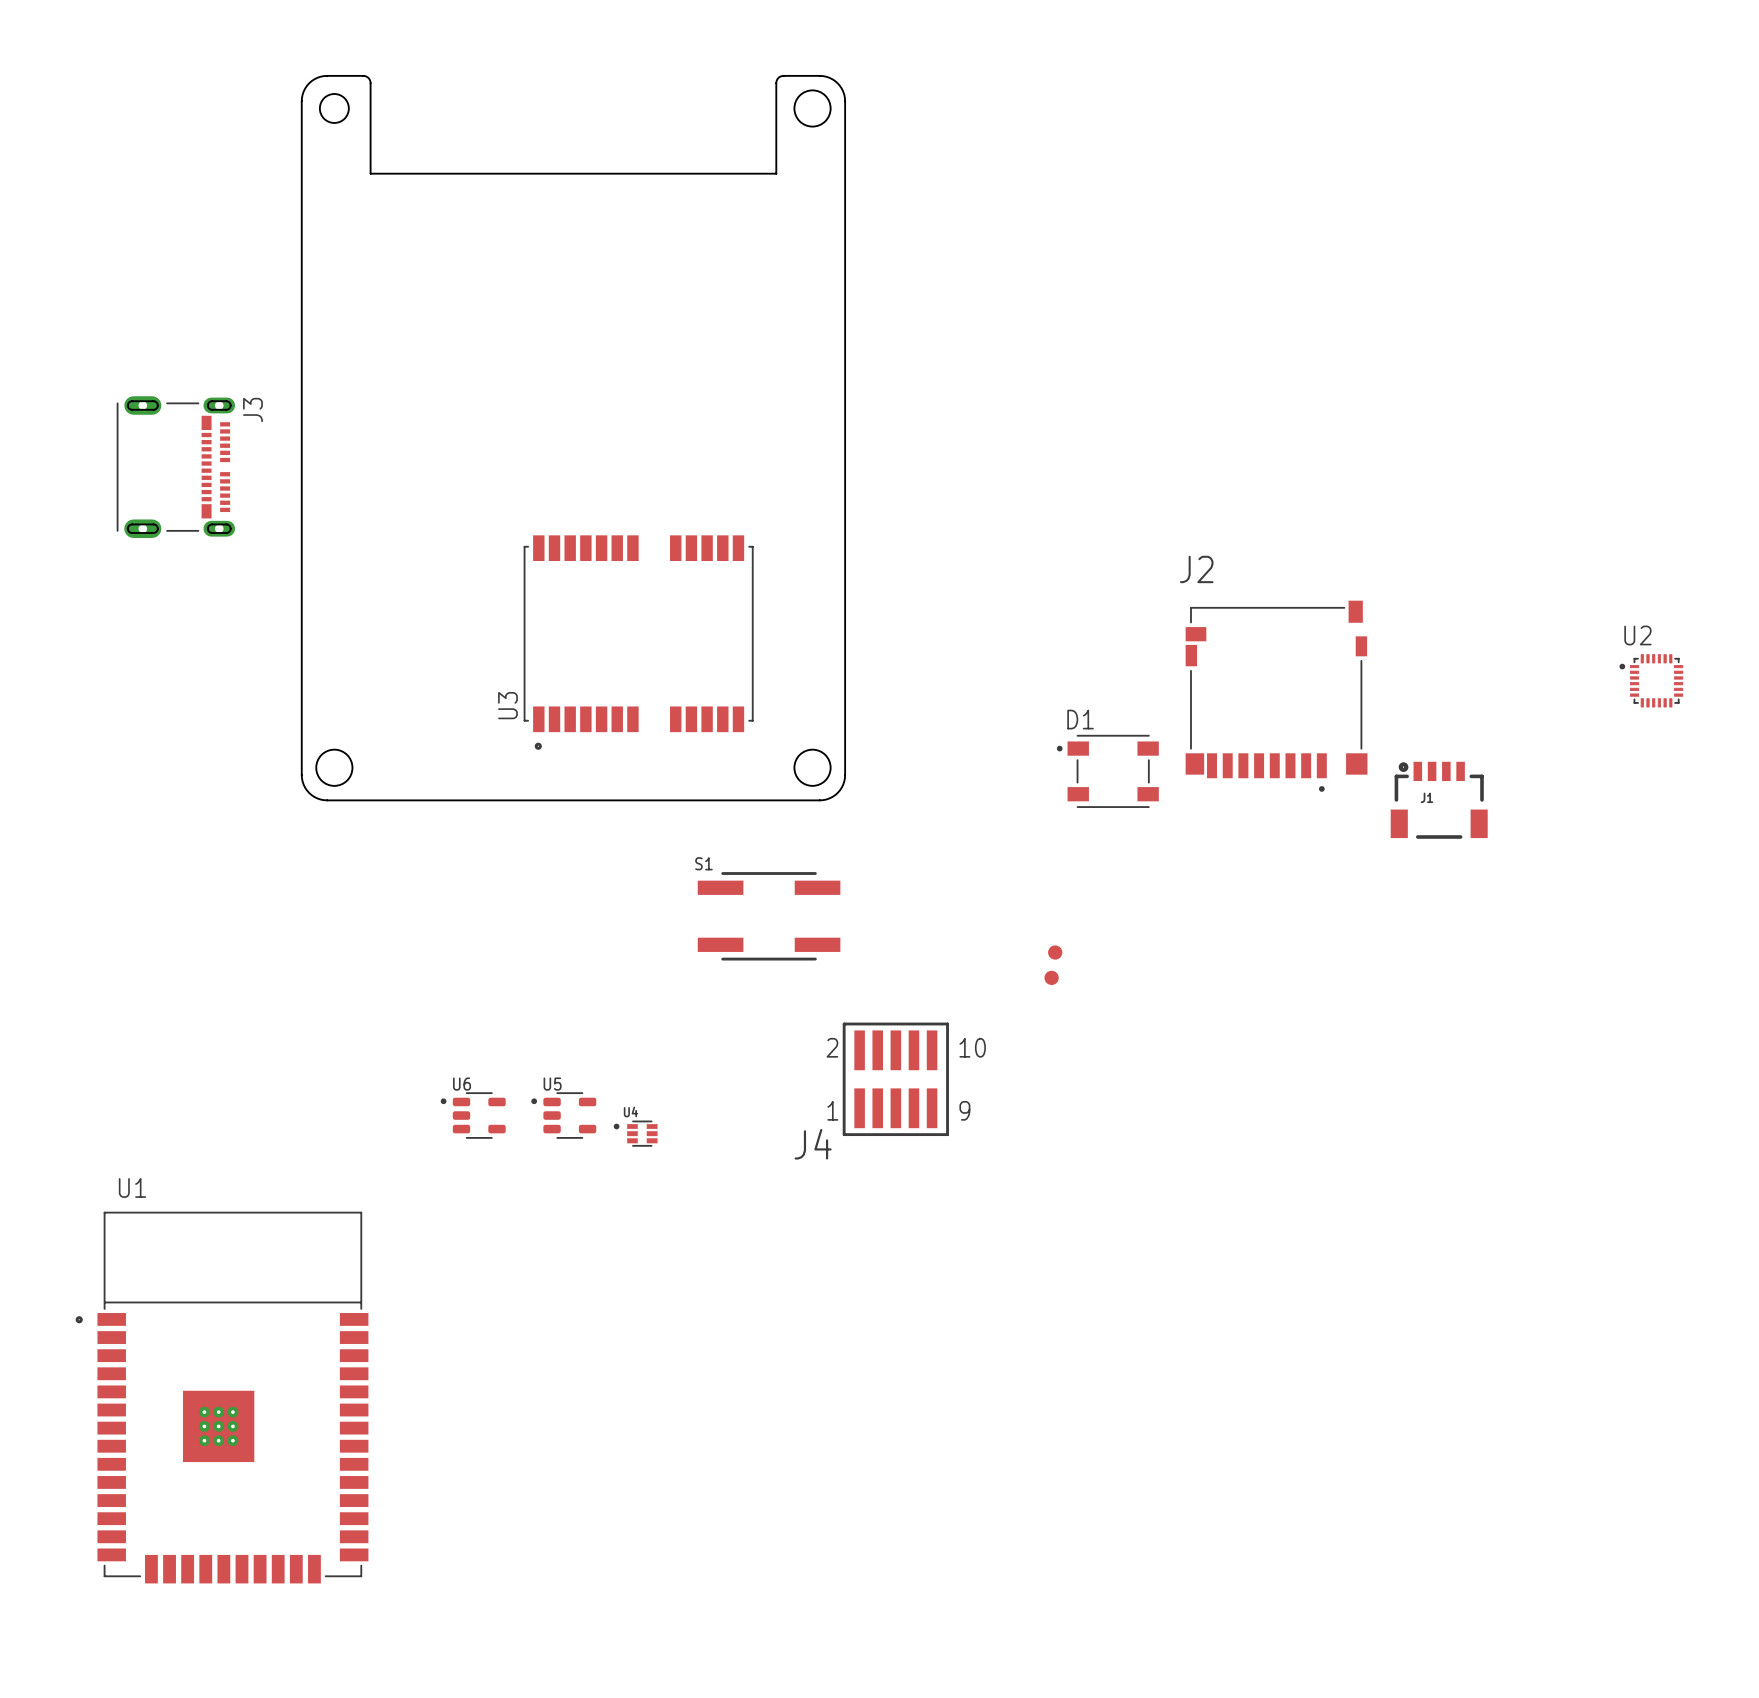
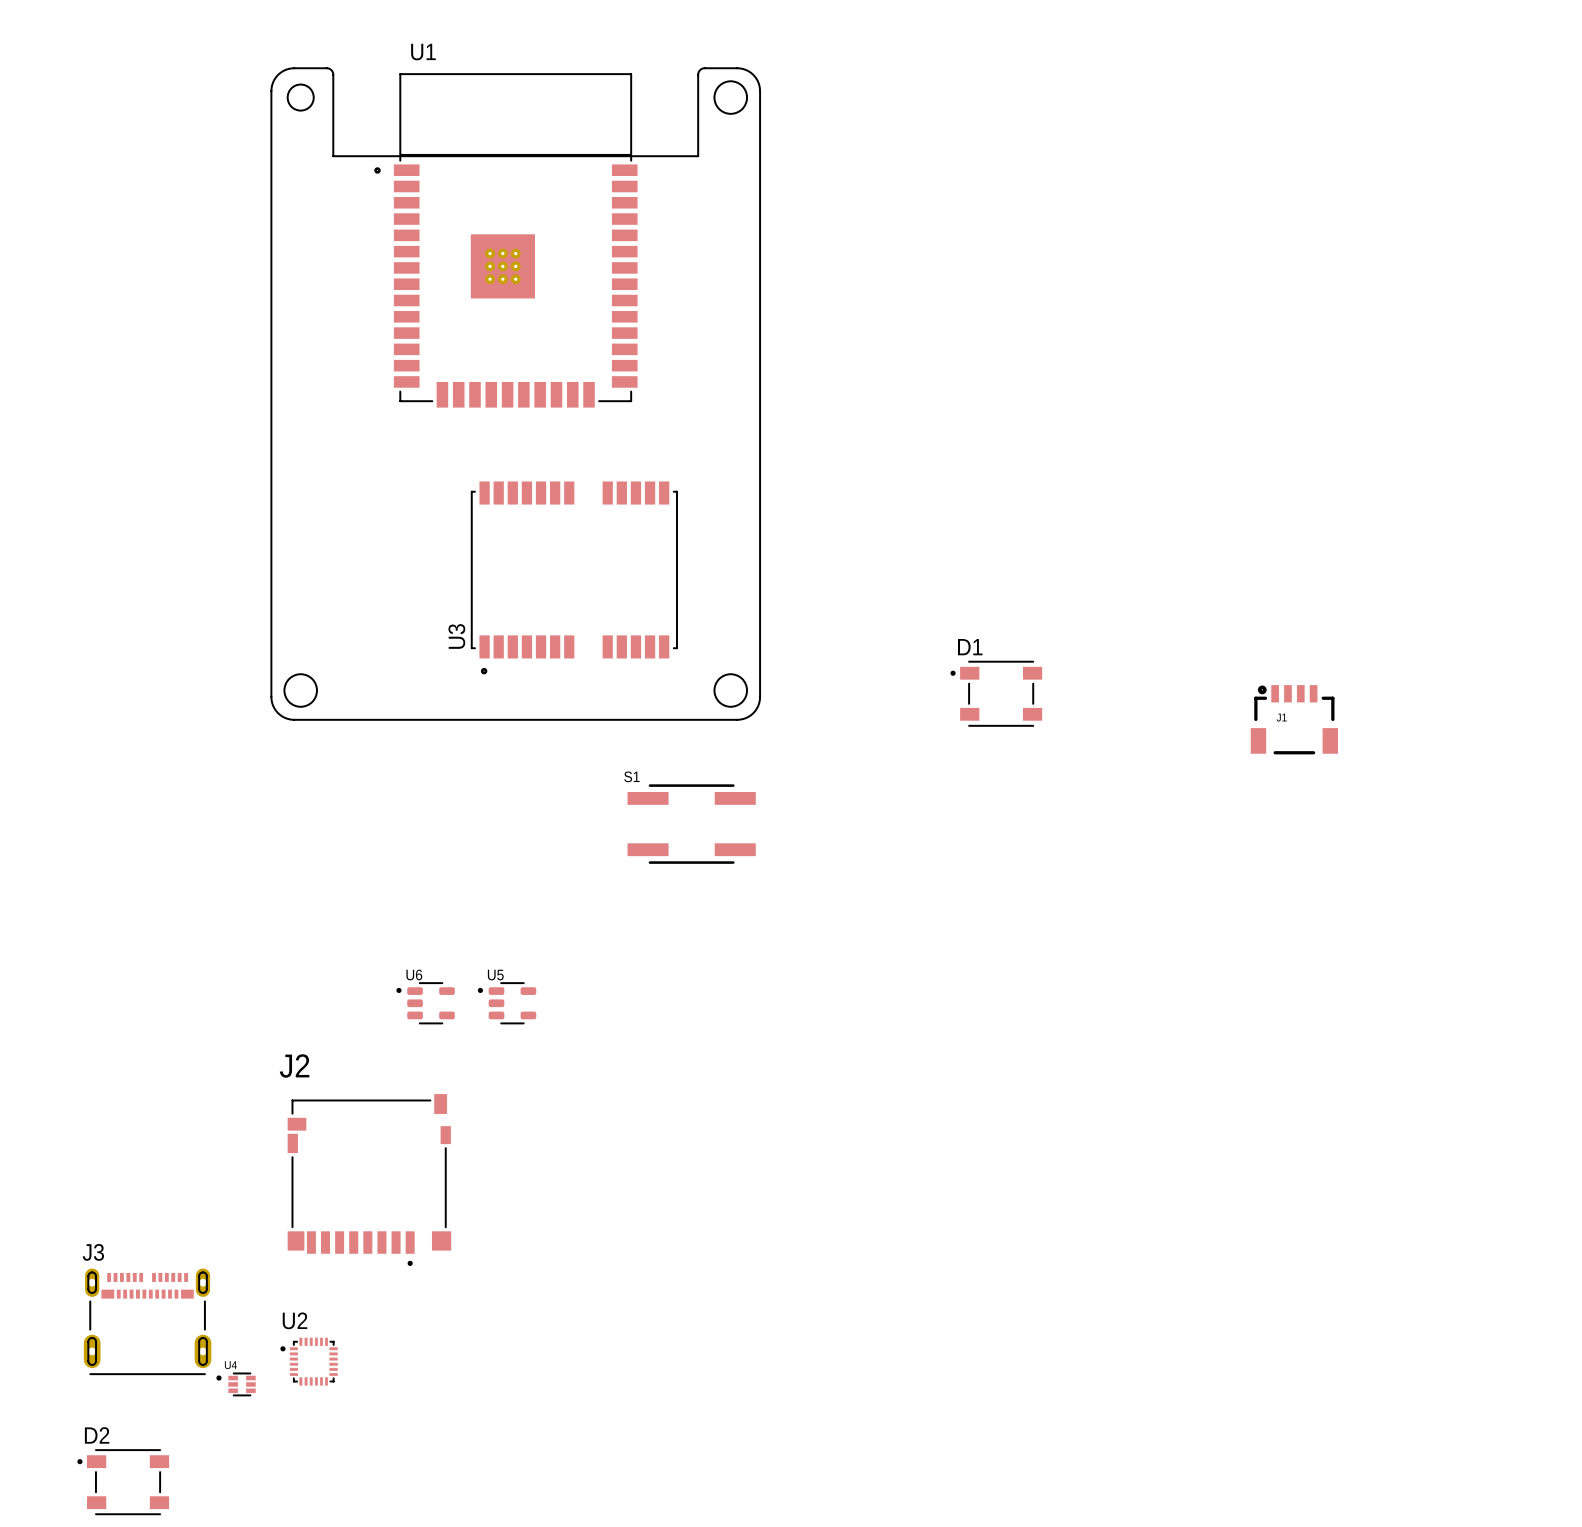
J3 rotation: 0° (175, 467) -> 90° counterclockwise (147, 1321)
J3 position: (175, 467) -> (147, 1321)
U2 position: (1651, 680) -> (309, 1361)
J2 position: (1276, 696) -> (369, 1180)
part: (1055, 952) -> none
part: (1051, 977) -> none
J4: (895, 1079) -> none
U4 position: (635, 1133) -> (236, 1384)
U1 position: (222, 1397) -> (505, 240)
D2: none -> (123, 1482)

